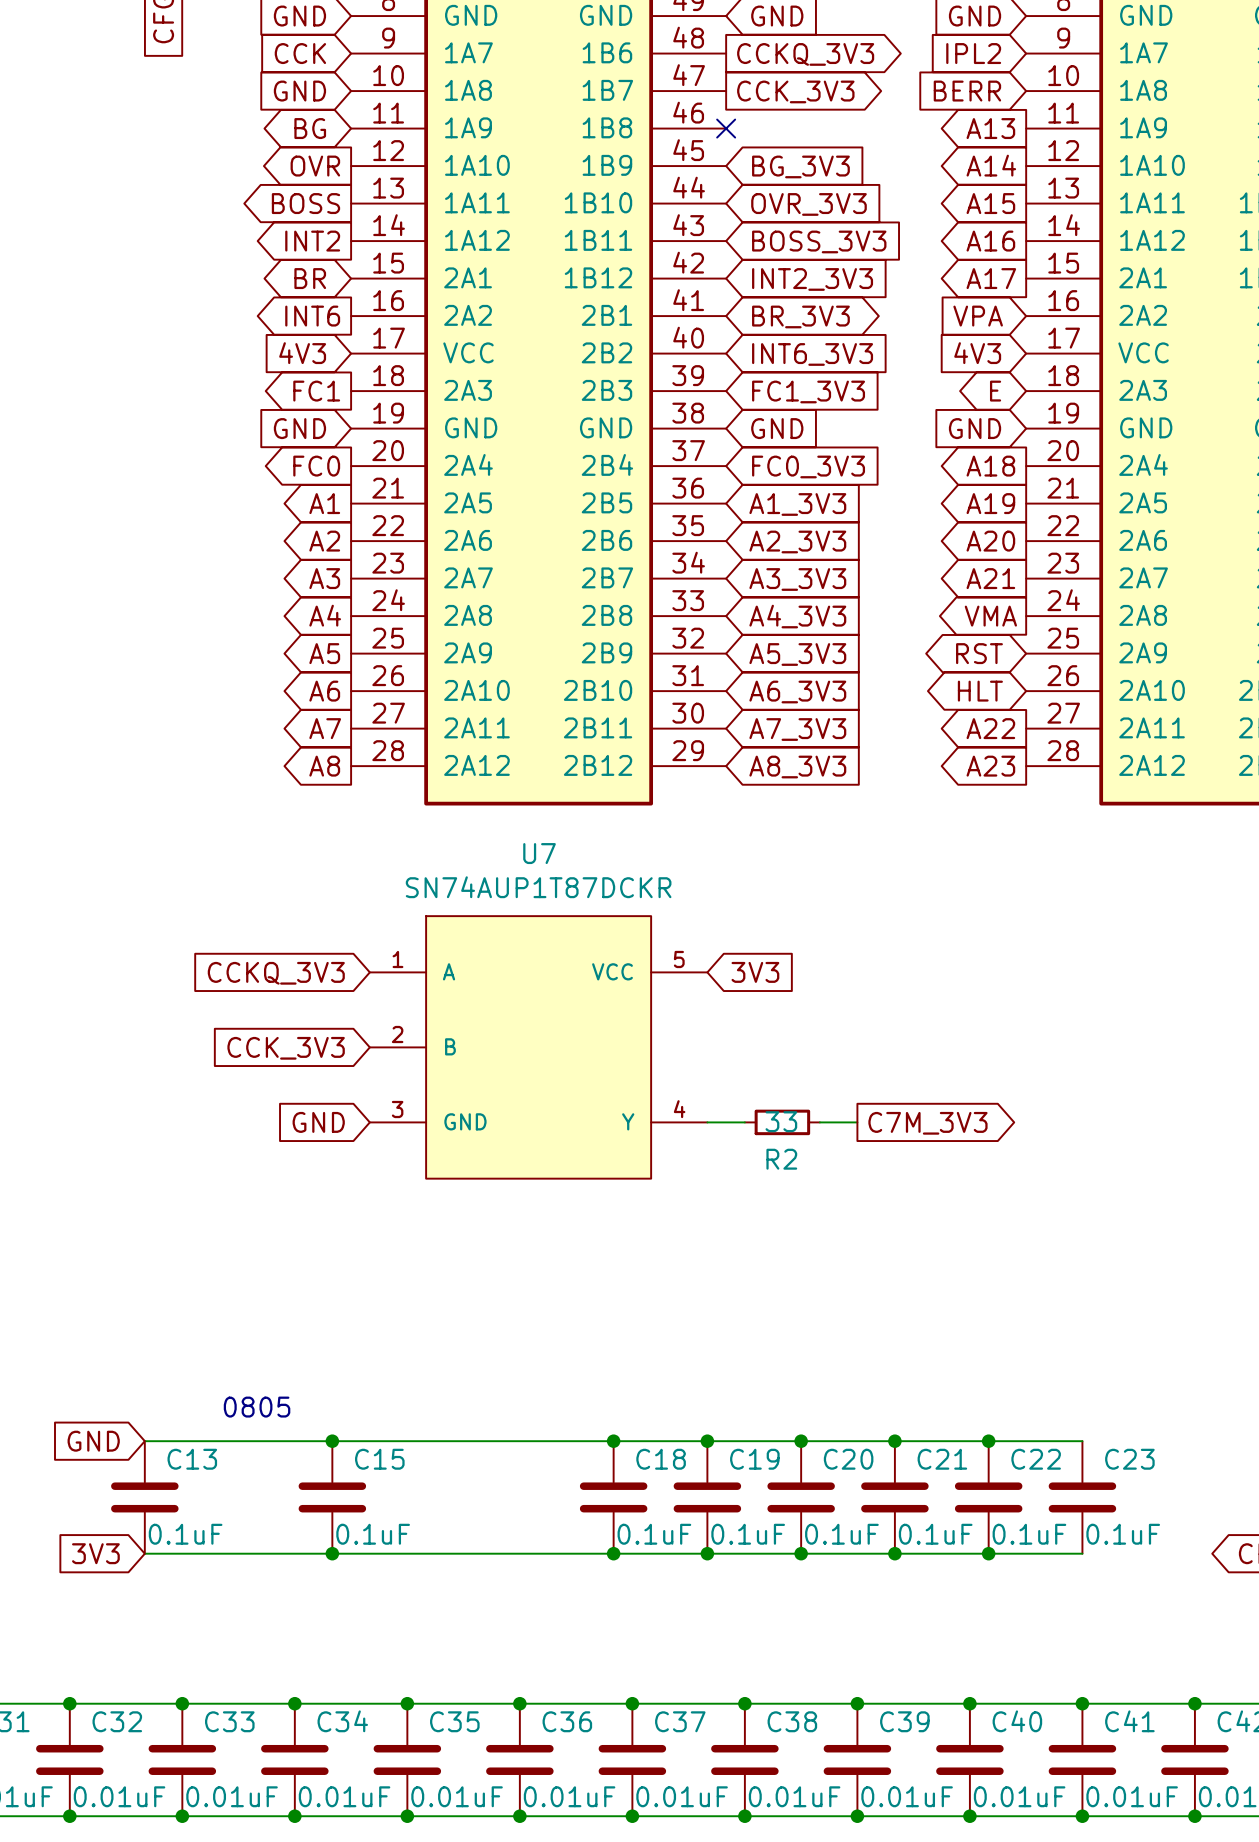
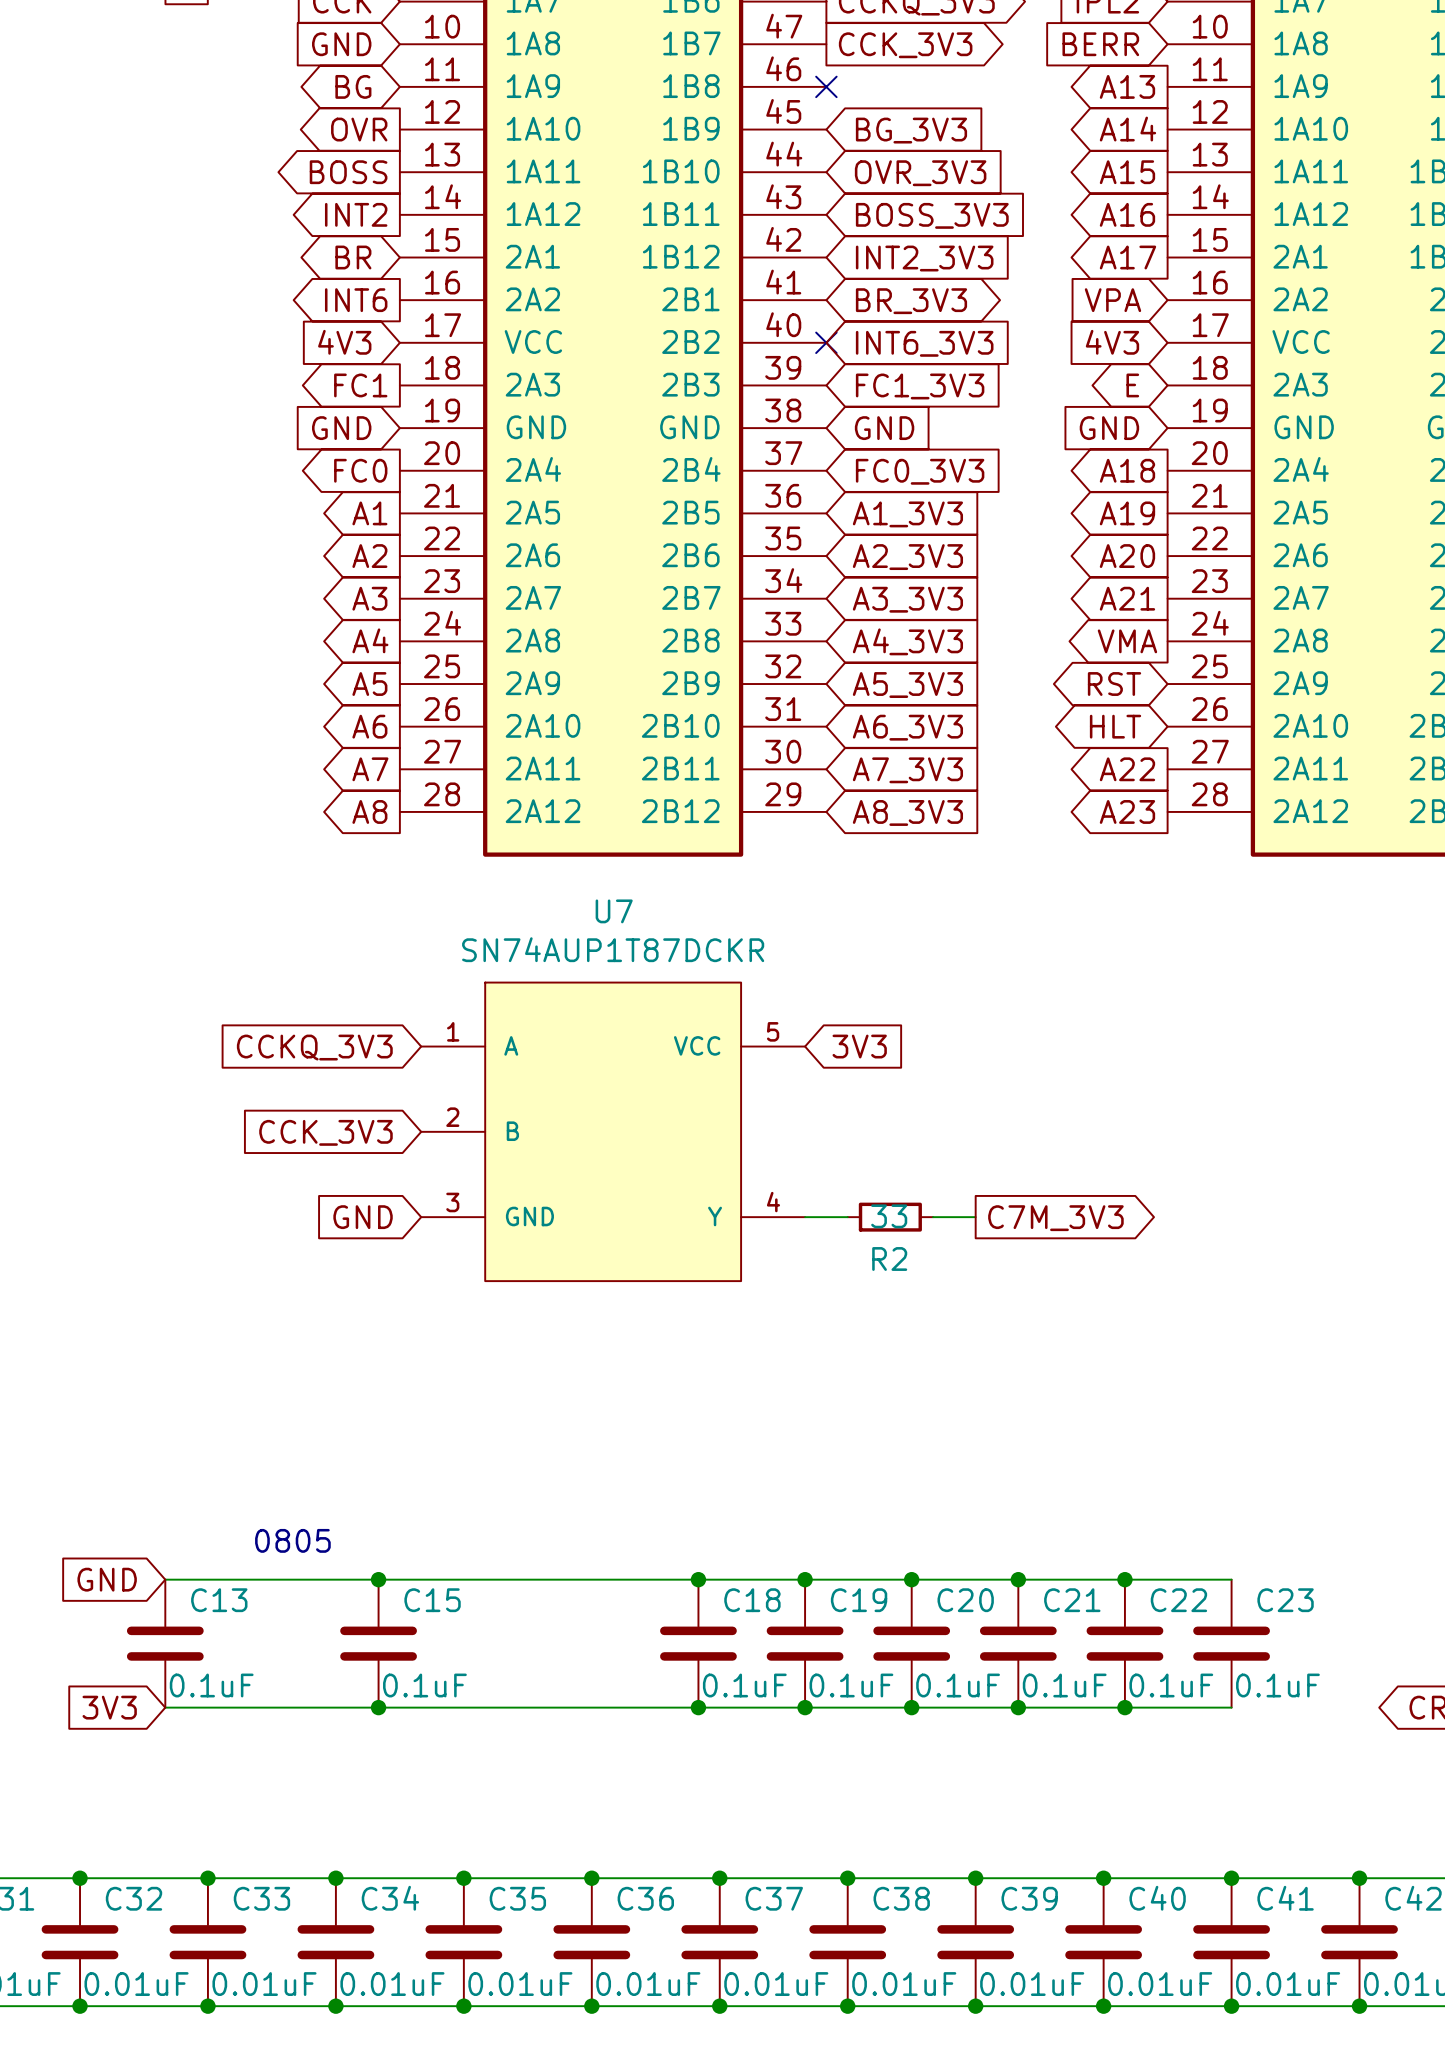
no-connect mark: none -> (826, 342)

